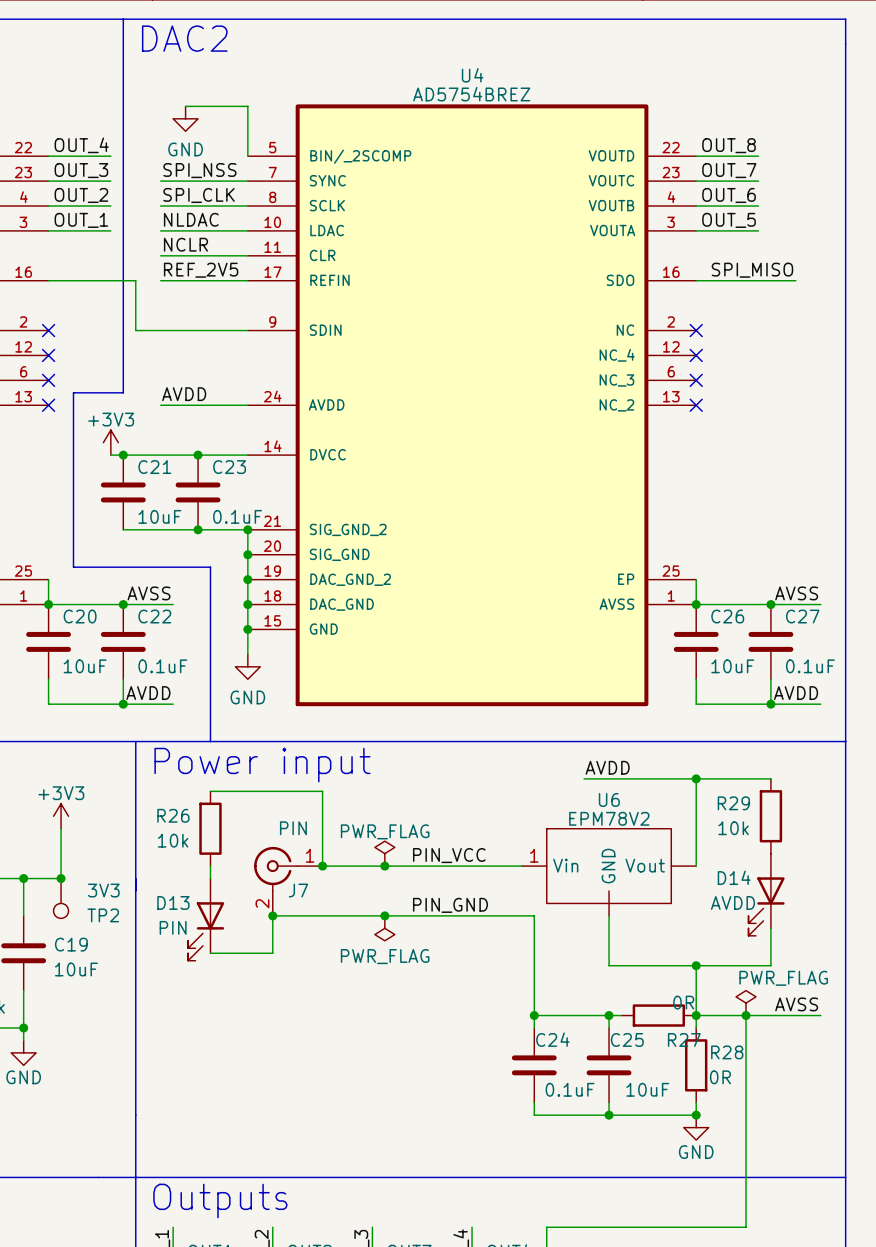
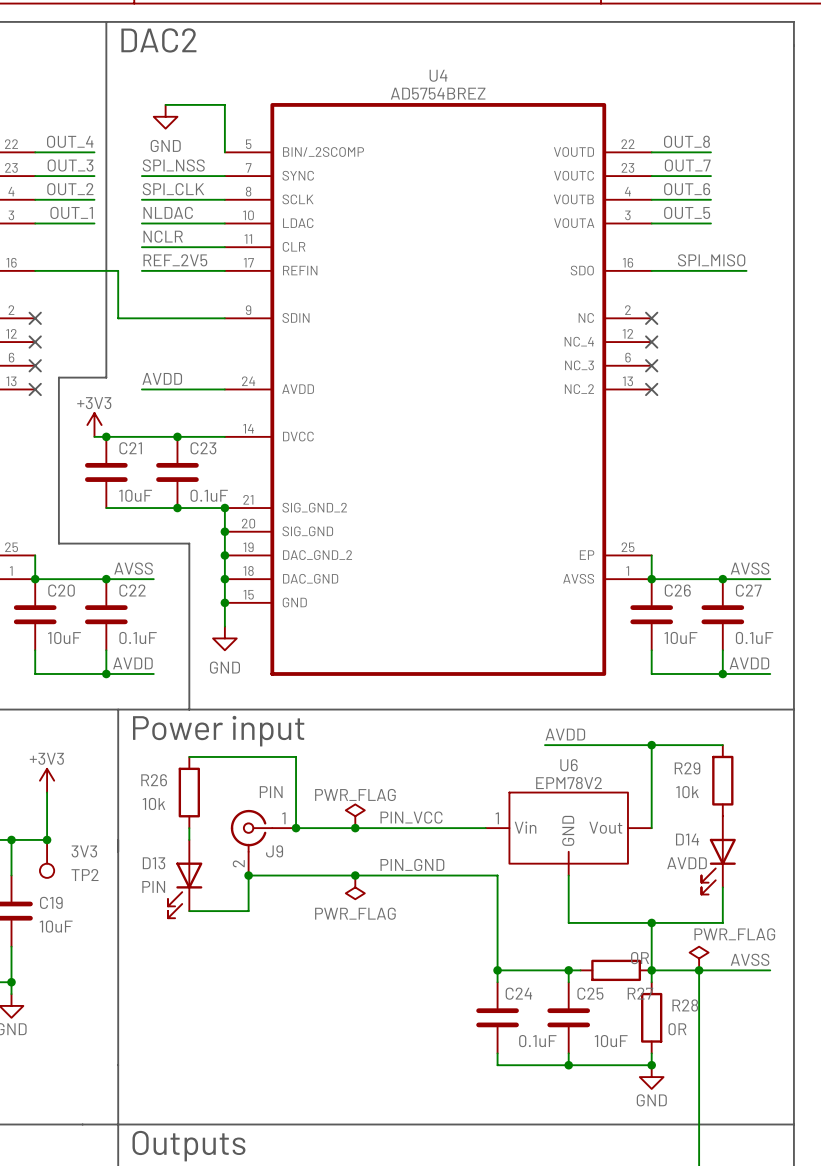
J7 name: J7 (298, 890) -> J9 (274, 851)

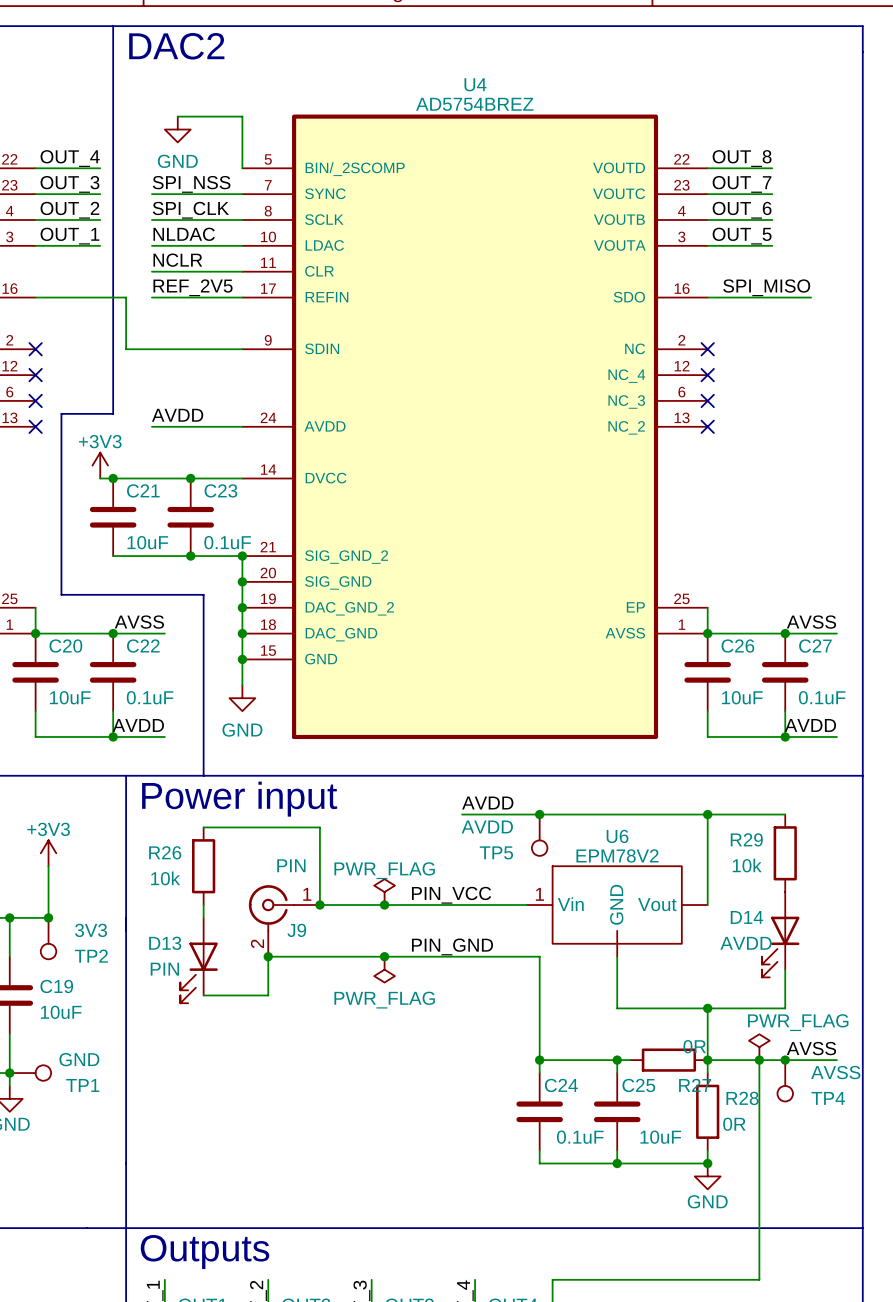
label position: AVDD (565, 734) -> AVDD (487, 803)
wire: none -> (462, 814) (591, 814)
junction: none -> (539, 814)
TP5: none -> AVDD (539, 835)
junction: none -> (785, 1060)
TP1: none -> GND (30, 1073)
TP4: none -> AVSS (785, 1080)

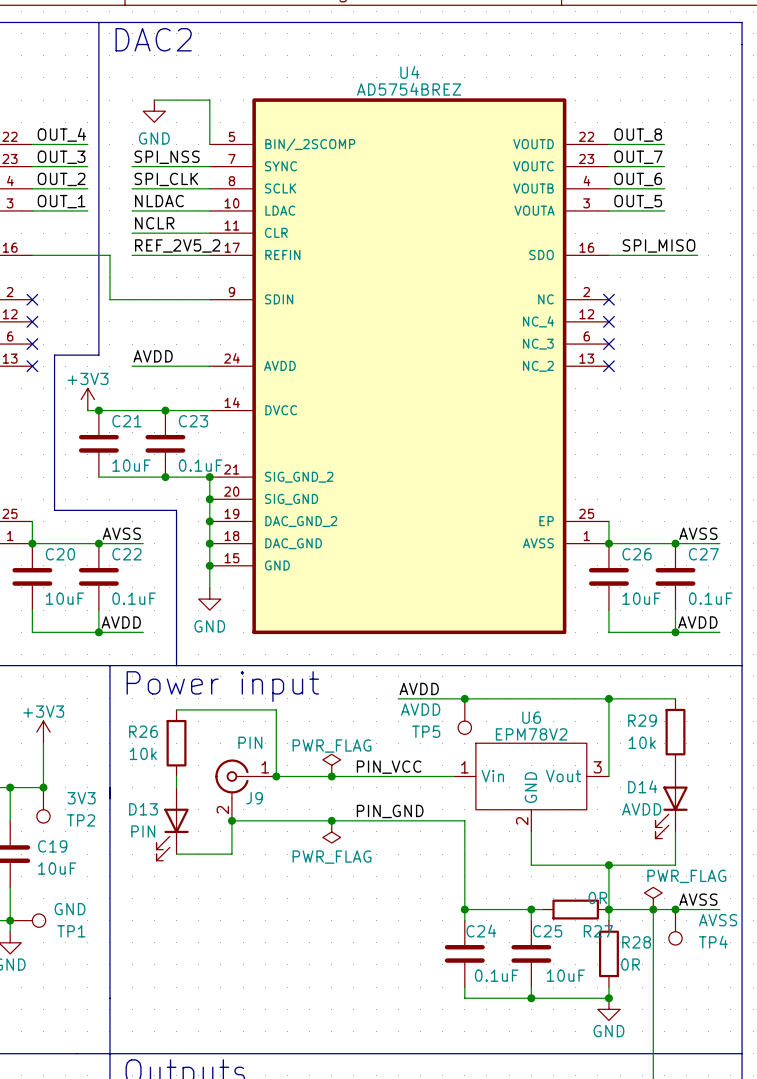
label: REF_2V5 (193, 287) -> REF_2V5_2 (177, 245)
U6 symbol: [526, 866, 708, 957] -> [453, 743, 609, 832]

